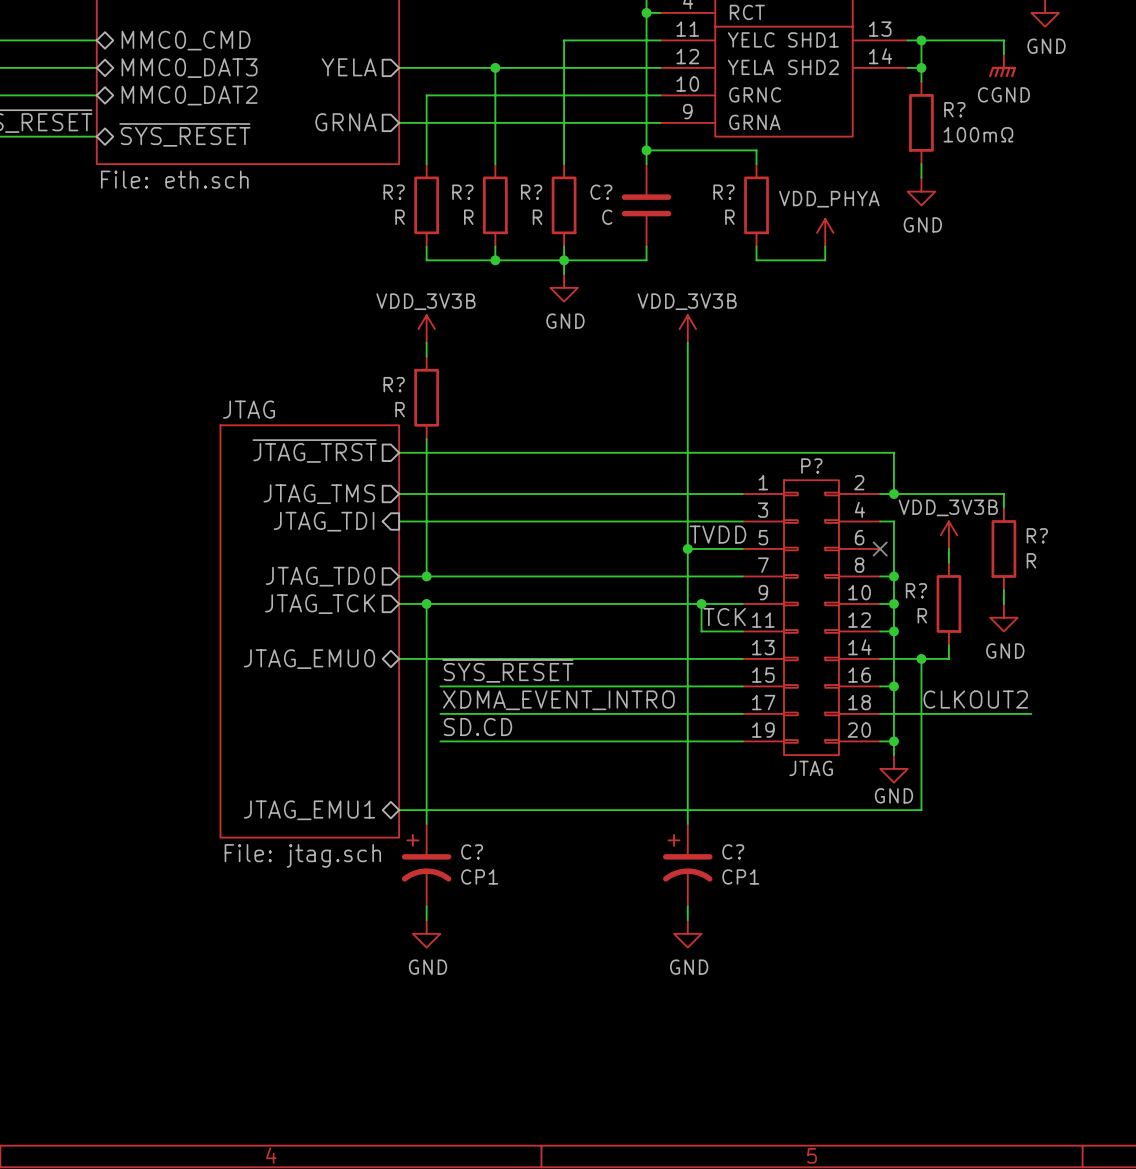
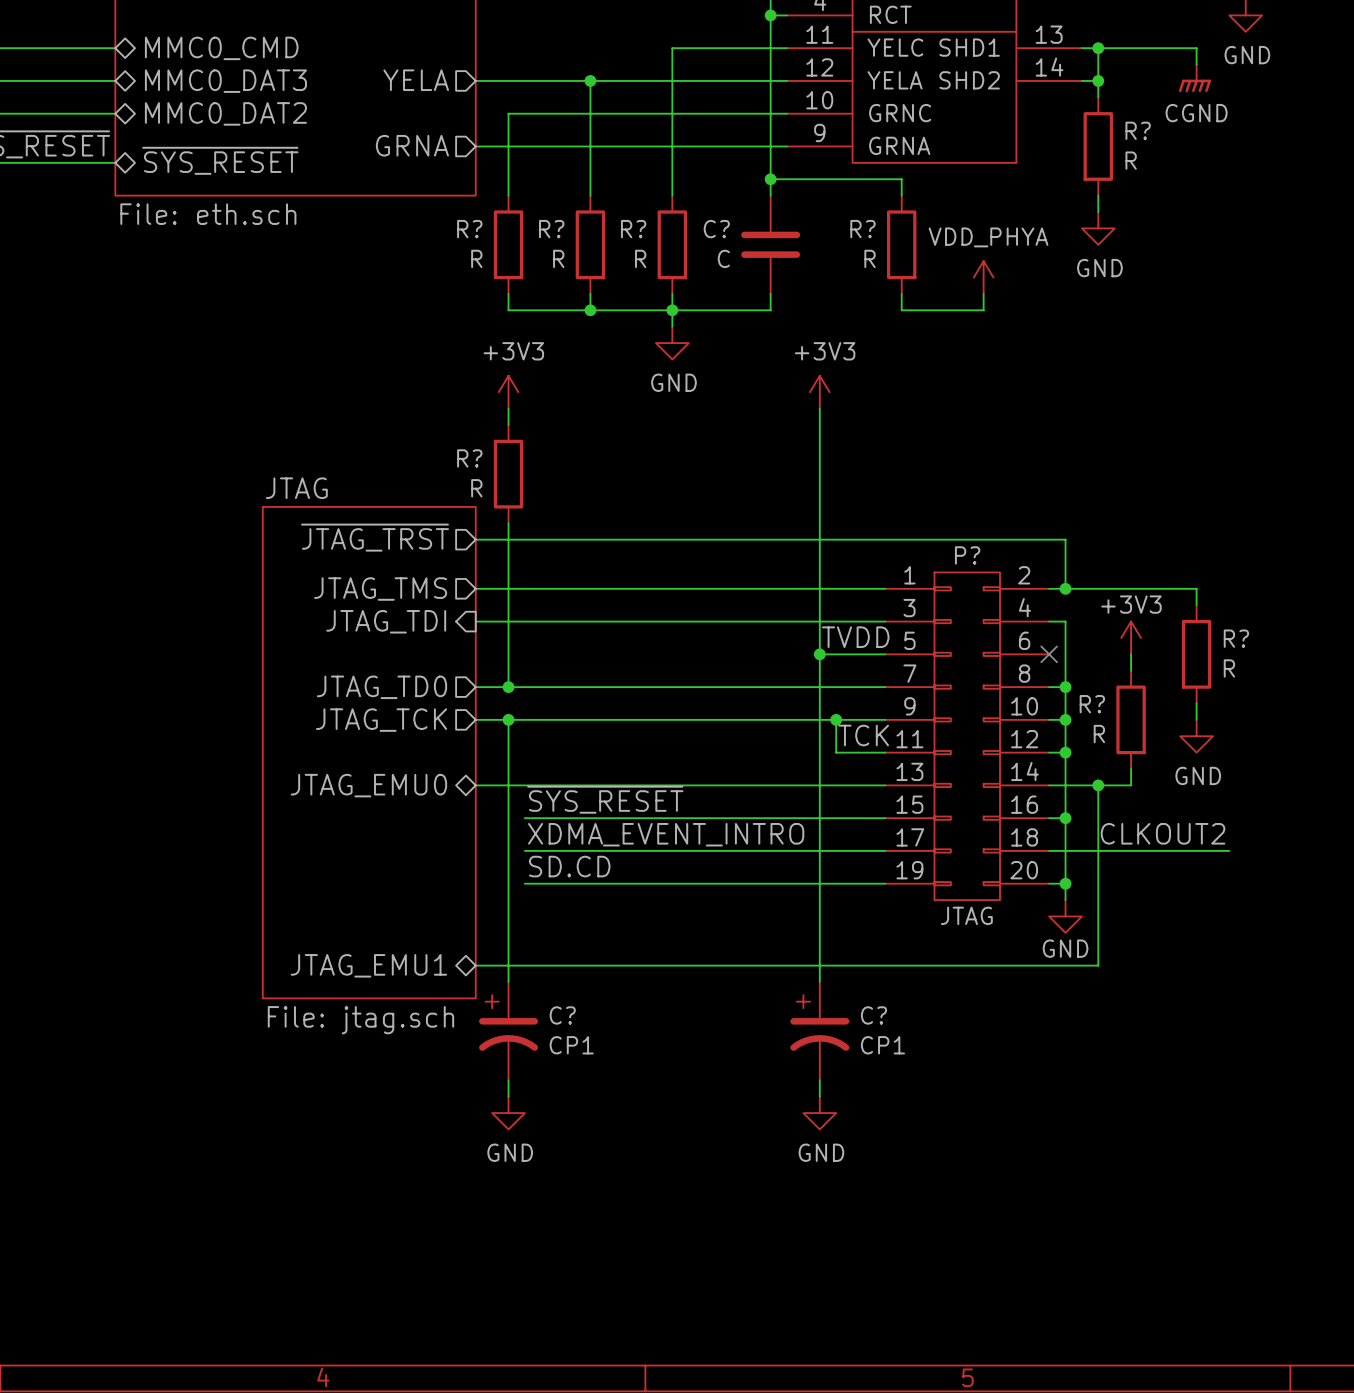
R? value: 100mΩ (978, 134) -> R (1131, 160)
power symbol: VDD_3V3B (426, 329) -> +3V3 (508, 392)
power symbol: VDD_3V3B (687, 329) -> +3V3 (819, 392)
power symbol: VDD_3V3B (948, 535) -> +3V3 (1131, 637)

